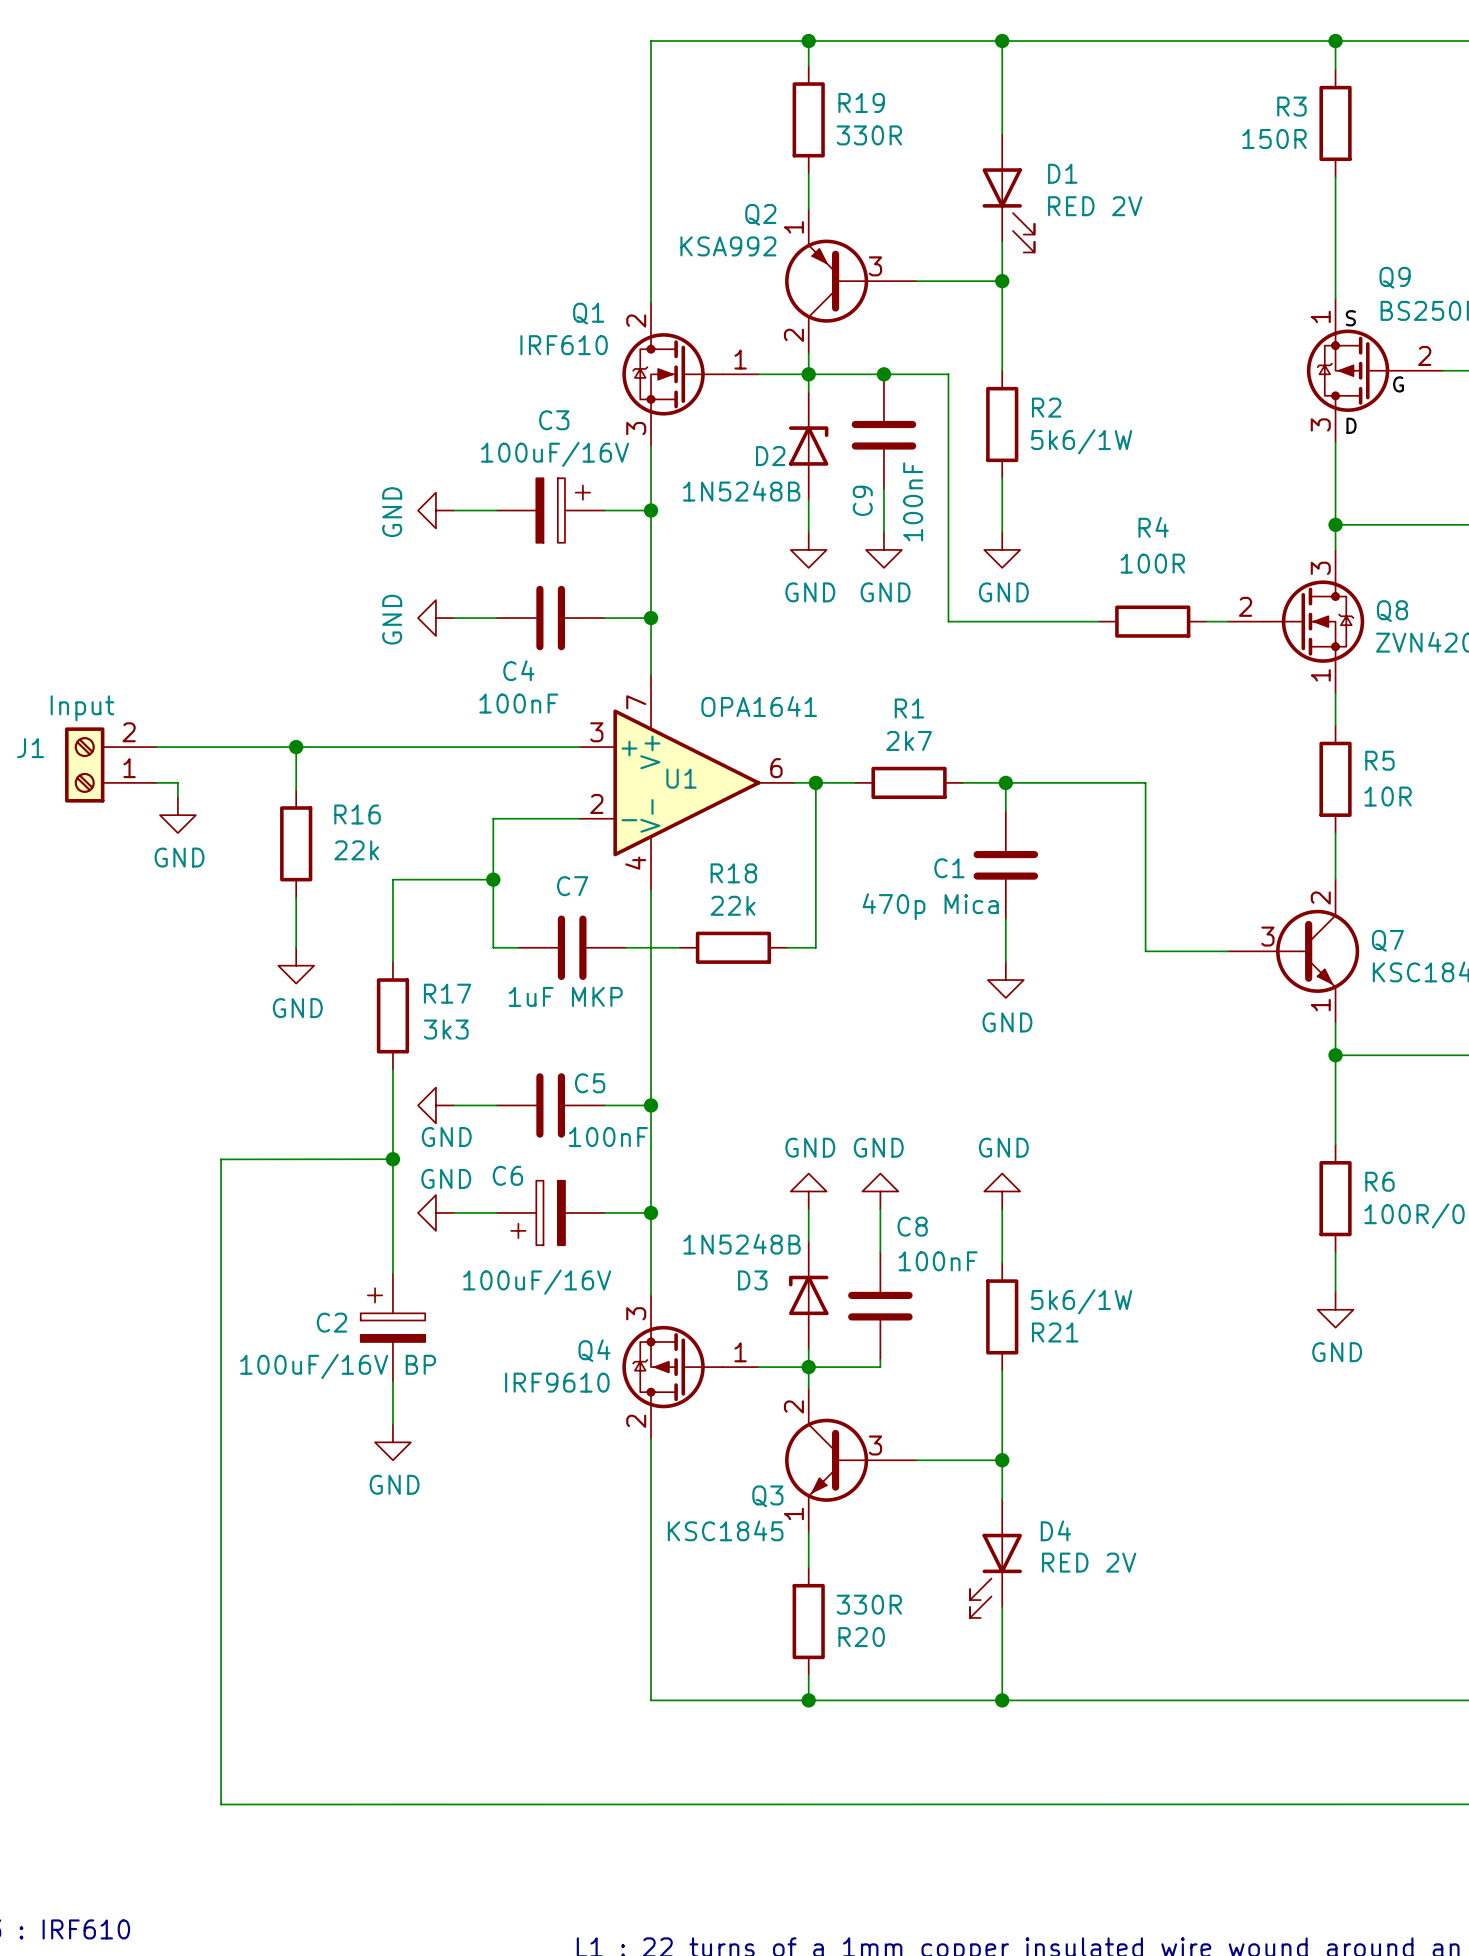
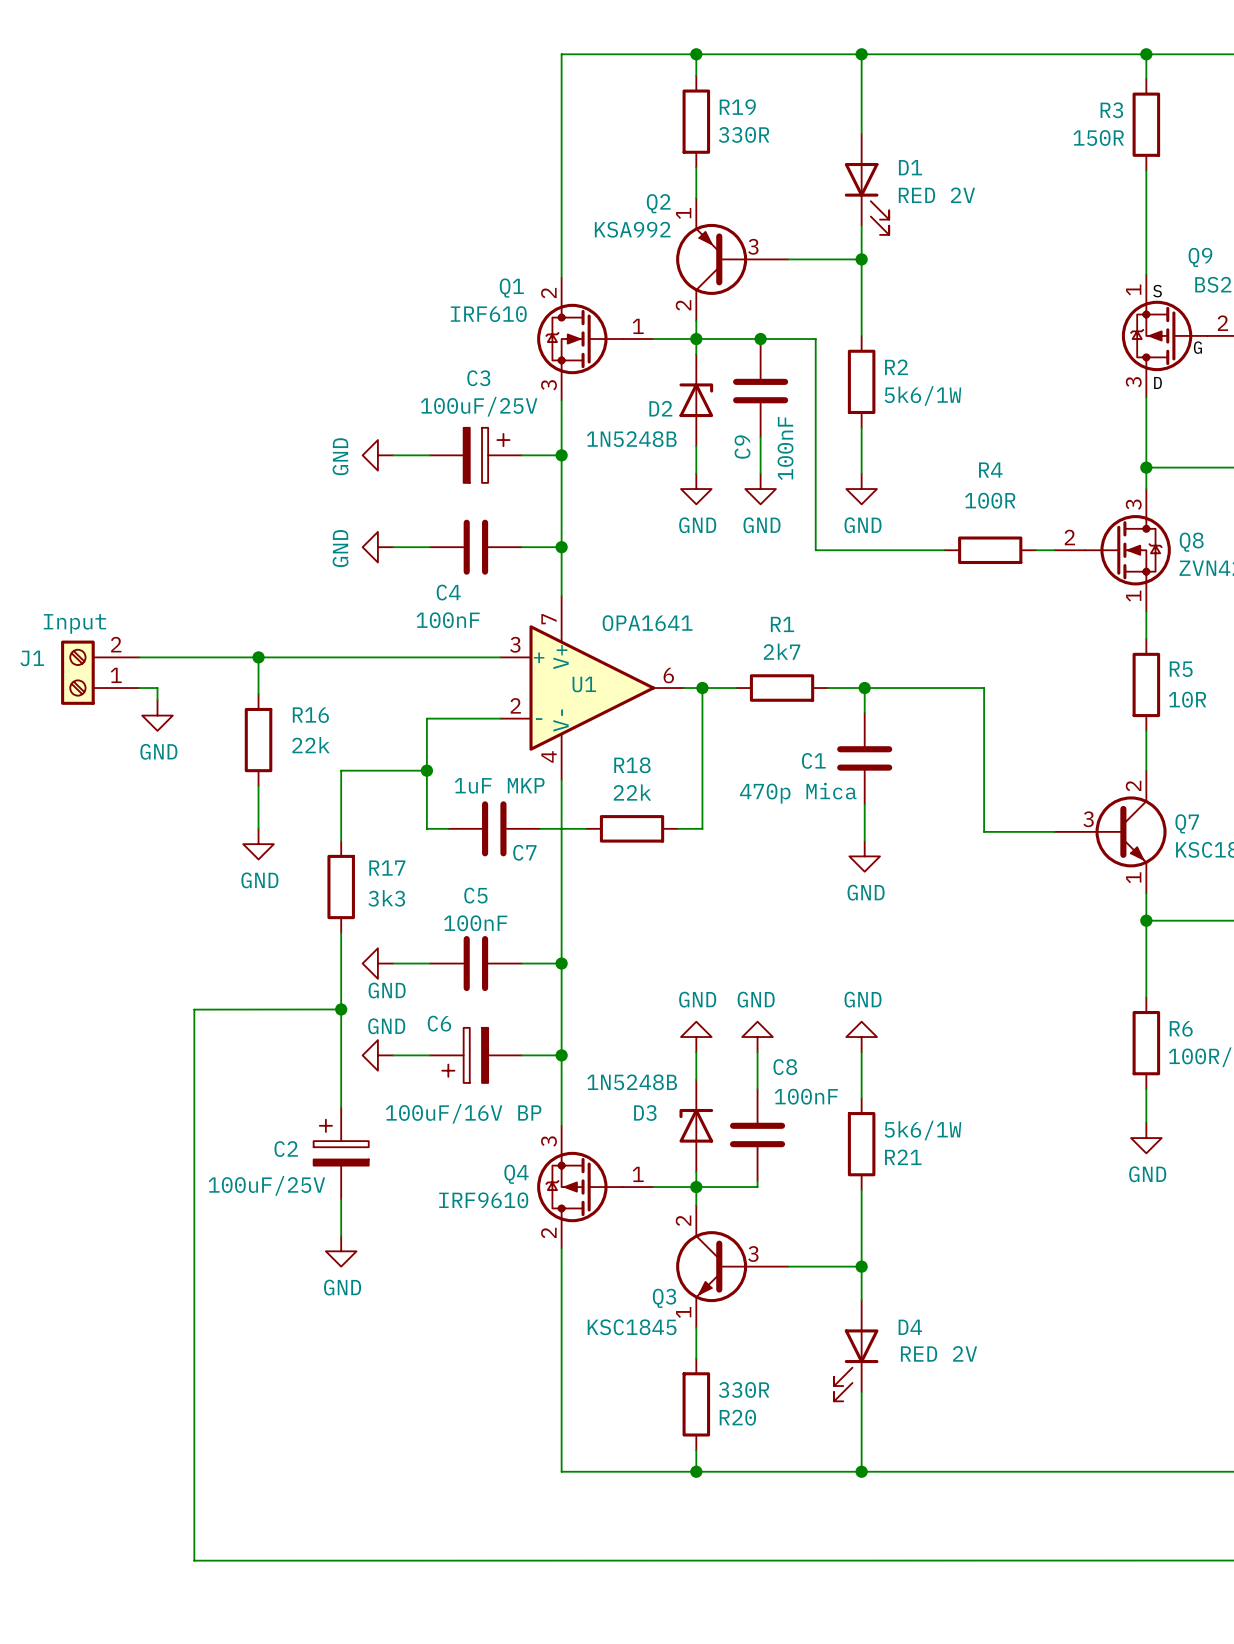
C3 value: 100uF/16V (555, 454) -> 100uF/25V (479, 406)
C7 name position: C7 (572, 886) -> C7 (524, 852)
C7 value position: 1uF MKP (565, 996) -> 1uF MKP (499, 785)
C5 name position: C5 (590, 1083) -> C5 (475, 895)
C5 value position: 100nF (608, 1137) -> 100nF (475, 923)
C6 value: 100uF/16V (537, 1282) -> 100uF/16V BP (463, 1113)
C2 value: 100uF/16V BP (338, 1366) -> 100uF/25V (266, 1185)

